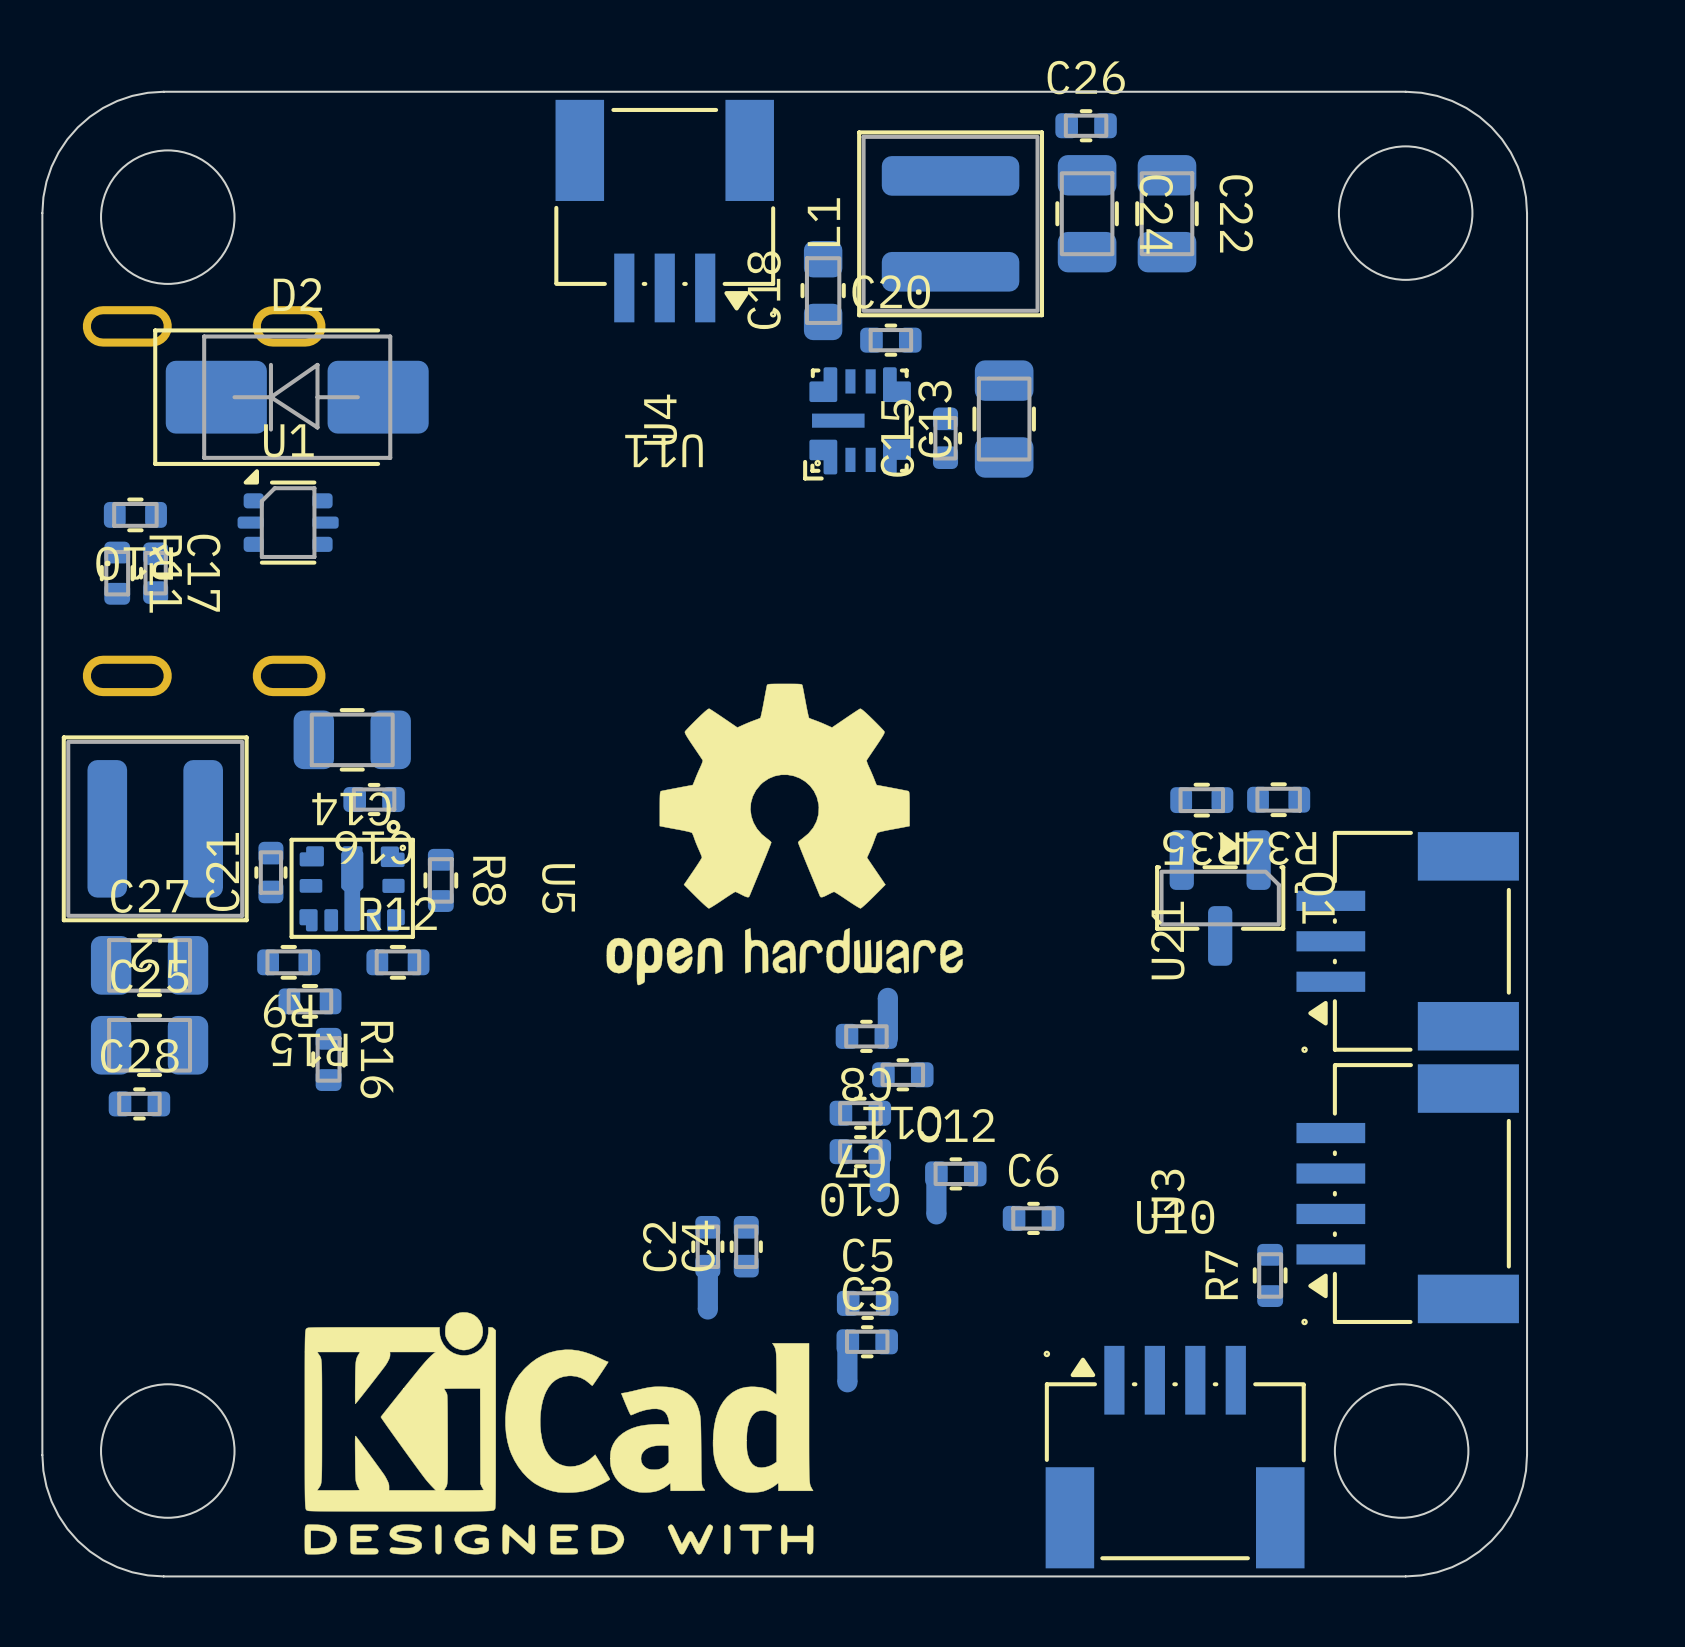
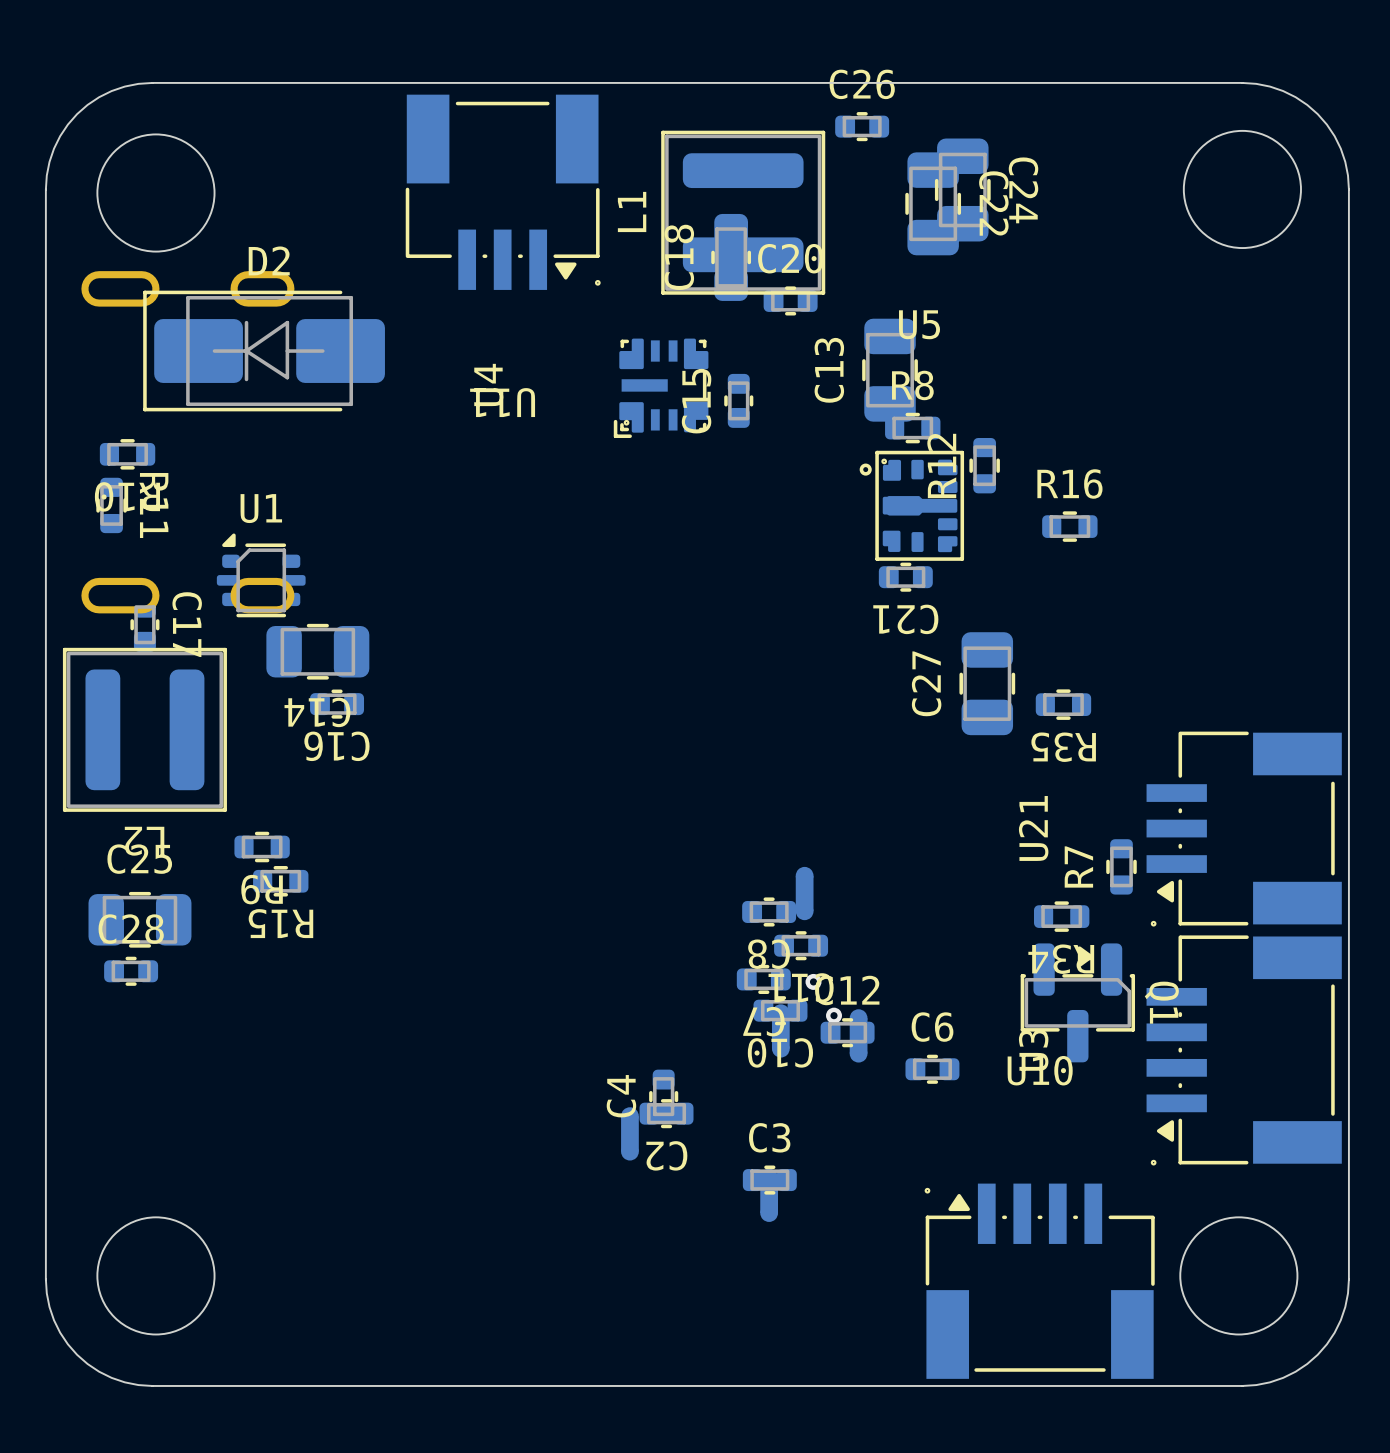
C26 position: (1086, 125) -> (862, 126)
U11 position: (665, 211) -> (503, 192)
C22 position: (1166, 213) -> (933, 203)
L1 position: (950, 223) -> (743, 212)
U4 position: (857, 423) -> (661, 388)
C15 position: (945, 438) -> (738, 400)
U1 position: (288, 516) -> (261, 575)
C17 position: (155, 573) -> (144, 624)
drawing: [606, 683, 963, 986] -> none
R34 position: (1278, 799) -> (1061, 916)
C21 rotation: 0° (270, 872) -> 90° clockwise (905, 577)
C21 position: (270, 872) -> (905, 577)
U5 rotation: 0° (352, 879) -> 90° counterclockwise (911, 505)
U5 position: (352, 879) -> (911, 505)
R8 rotation: 0° (440, 880) -> 90° clockwise (912, 428)
R8 position: (440, 880) -> (912, 428)
C27 name position: C27 (149, 896) -> C27 (926, 683)
Q1 position: (1220, 898) -> (1077, 1002)
R12 rotation: 0° (397, 962) -> 90° clockwise (984, 465)
R12 position: (397, 962) -> (984, 465)
C27 rotation: 0° (149, 965) -> 90° clockwise (987, 683)
C27 position: (149, 965) -> (987, 683)
part position: (887, 1018) -> (804, 893)
R16 rotation: 0° (328, 1059) -> 90° clockwise (1069, 526)
R16 position: (328, 1059) -> (1069, 526)
via: none -> (813, 981)
C10 position: (860, 1151) -> (780, 1010)
via: none -> (834, 1015)
part position: (936, 1194) -> (858, 1035)
C6 position: (1033, 1218) -> (932, 1069)
C2 rotation: 0° (707, 1246) -> 90° clockwise (666, 1113)
C2 position: (707, 1246) -> (666, 1113)
R7 position: (1270, 1275) -> (1121, 866)
C5: (867, 1303) -> none
drawing: [304, 1312, 814, 1555] -> none
part position: (847, 1362) -> (769, 1195)

